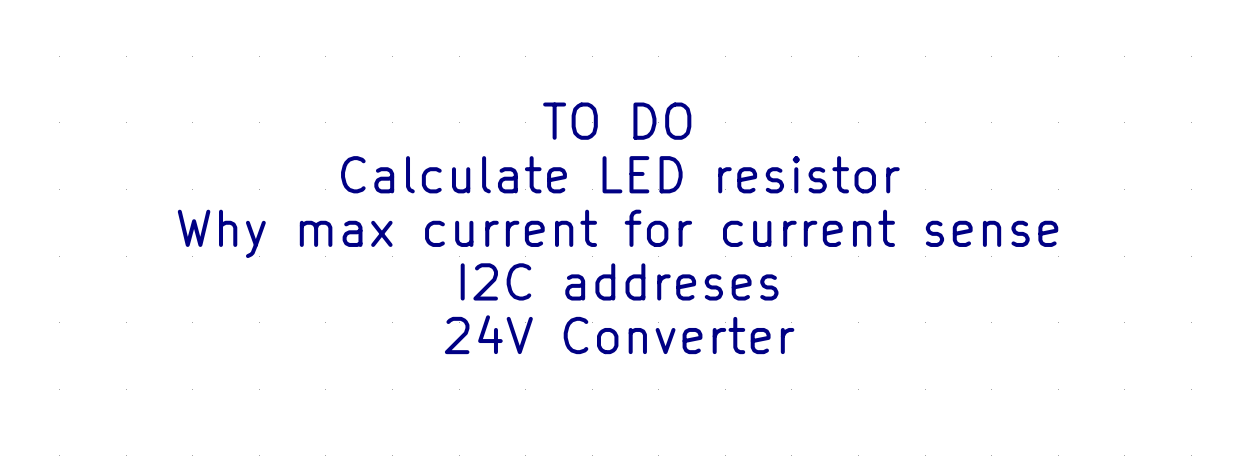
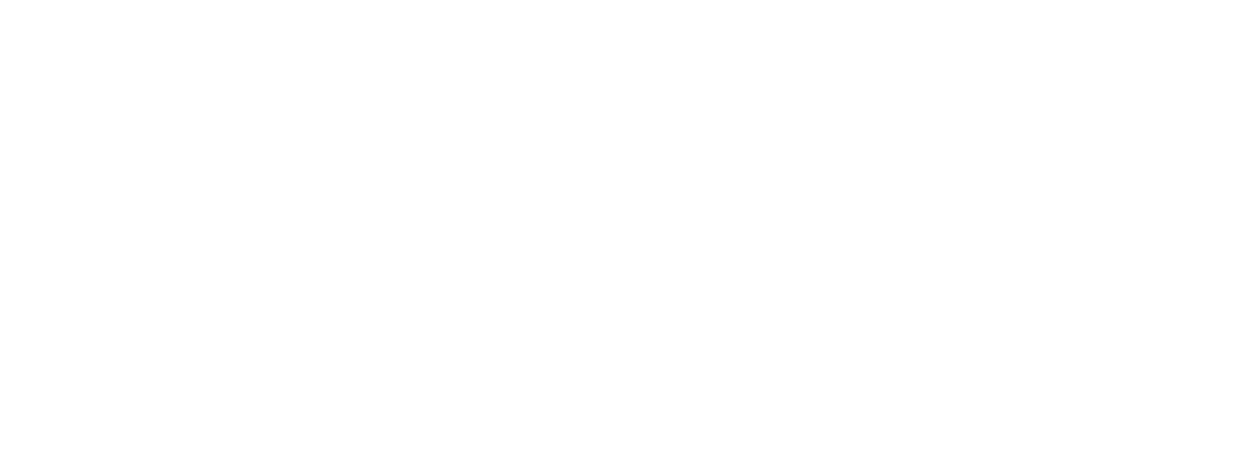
text: TO DO (617, 121) -> none
text: Calculate LED resistor (620, 174) -> none
text: Why max current for current sense (618, 233) -> none
text: I2C addreses (619, 281) -> none
text: 24V Converter (619, 334) -> none

